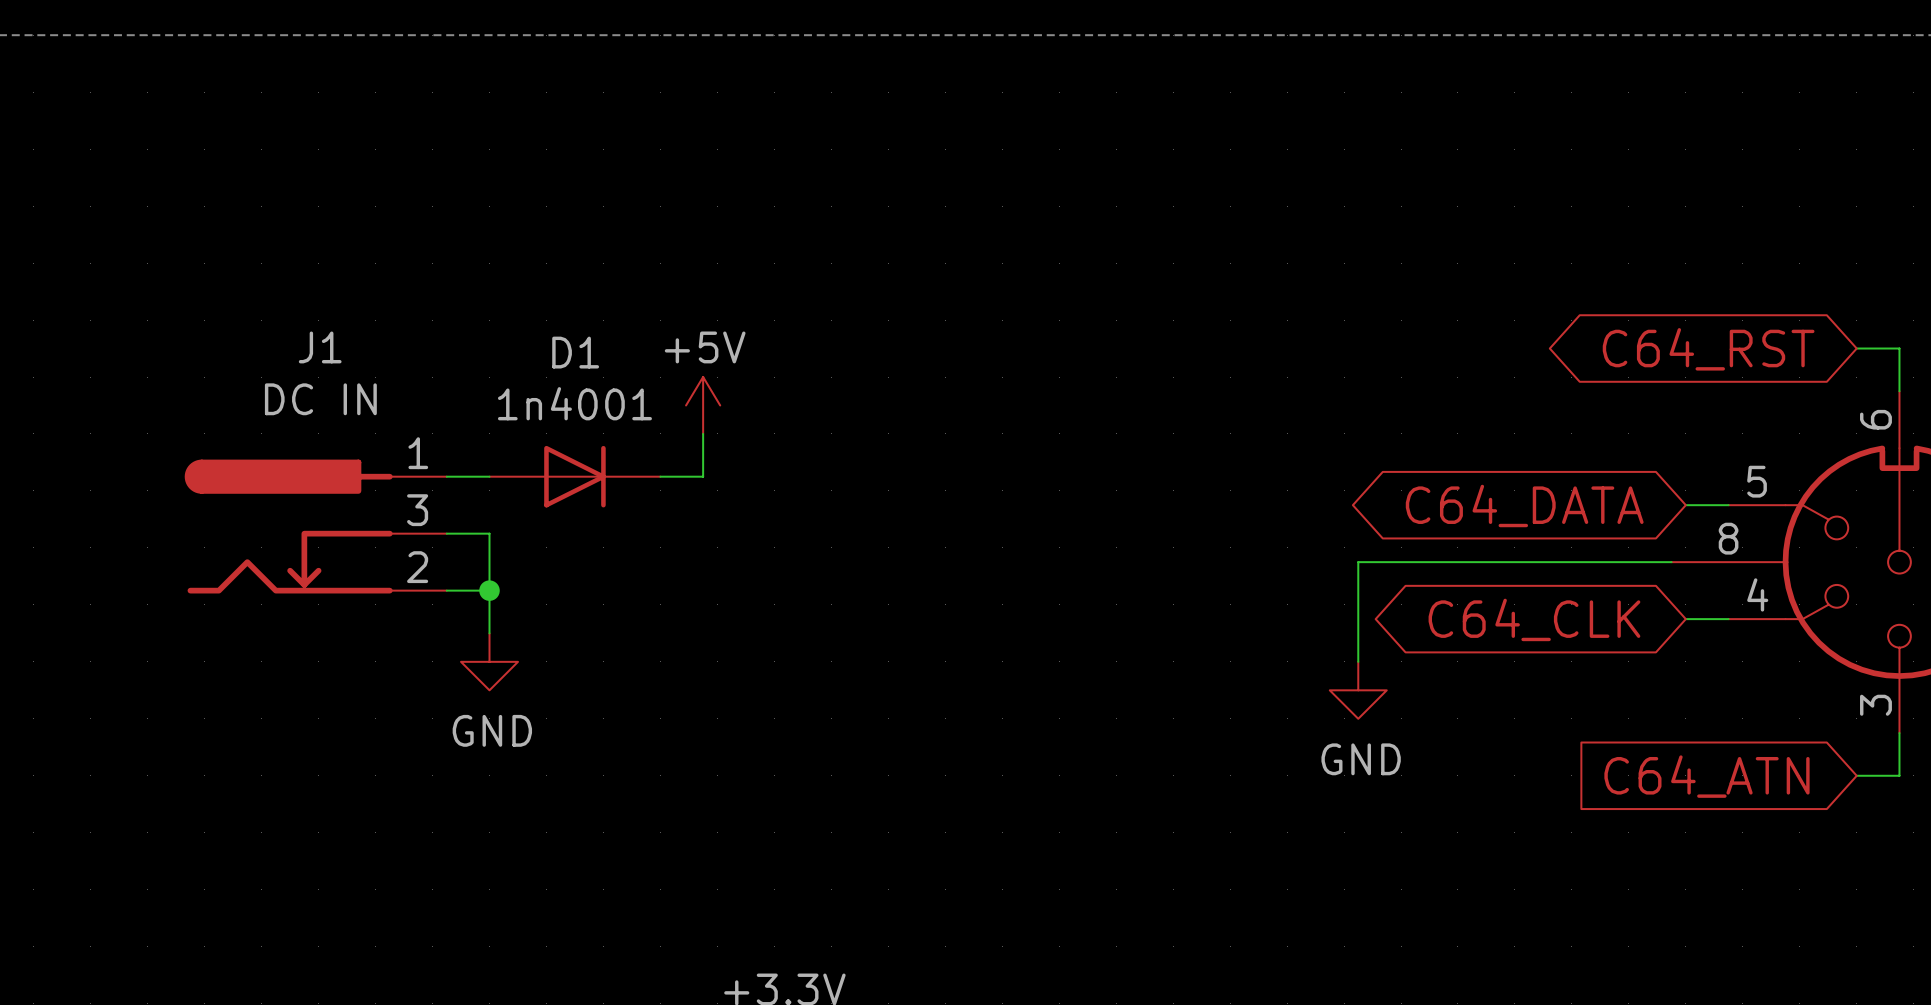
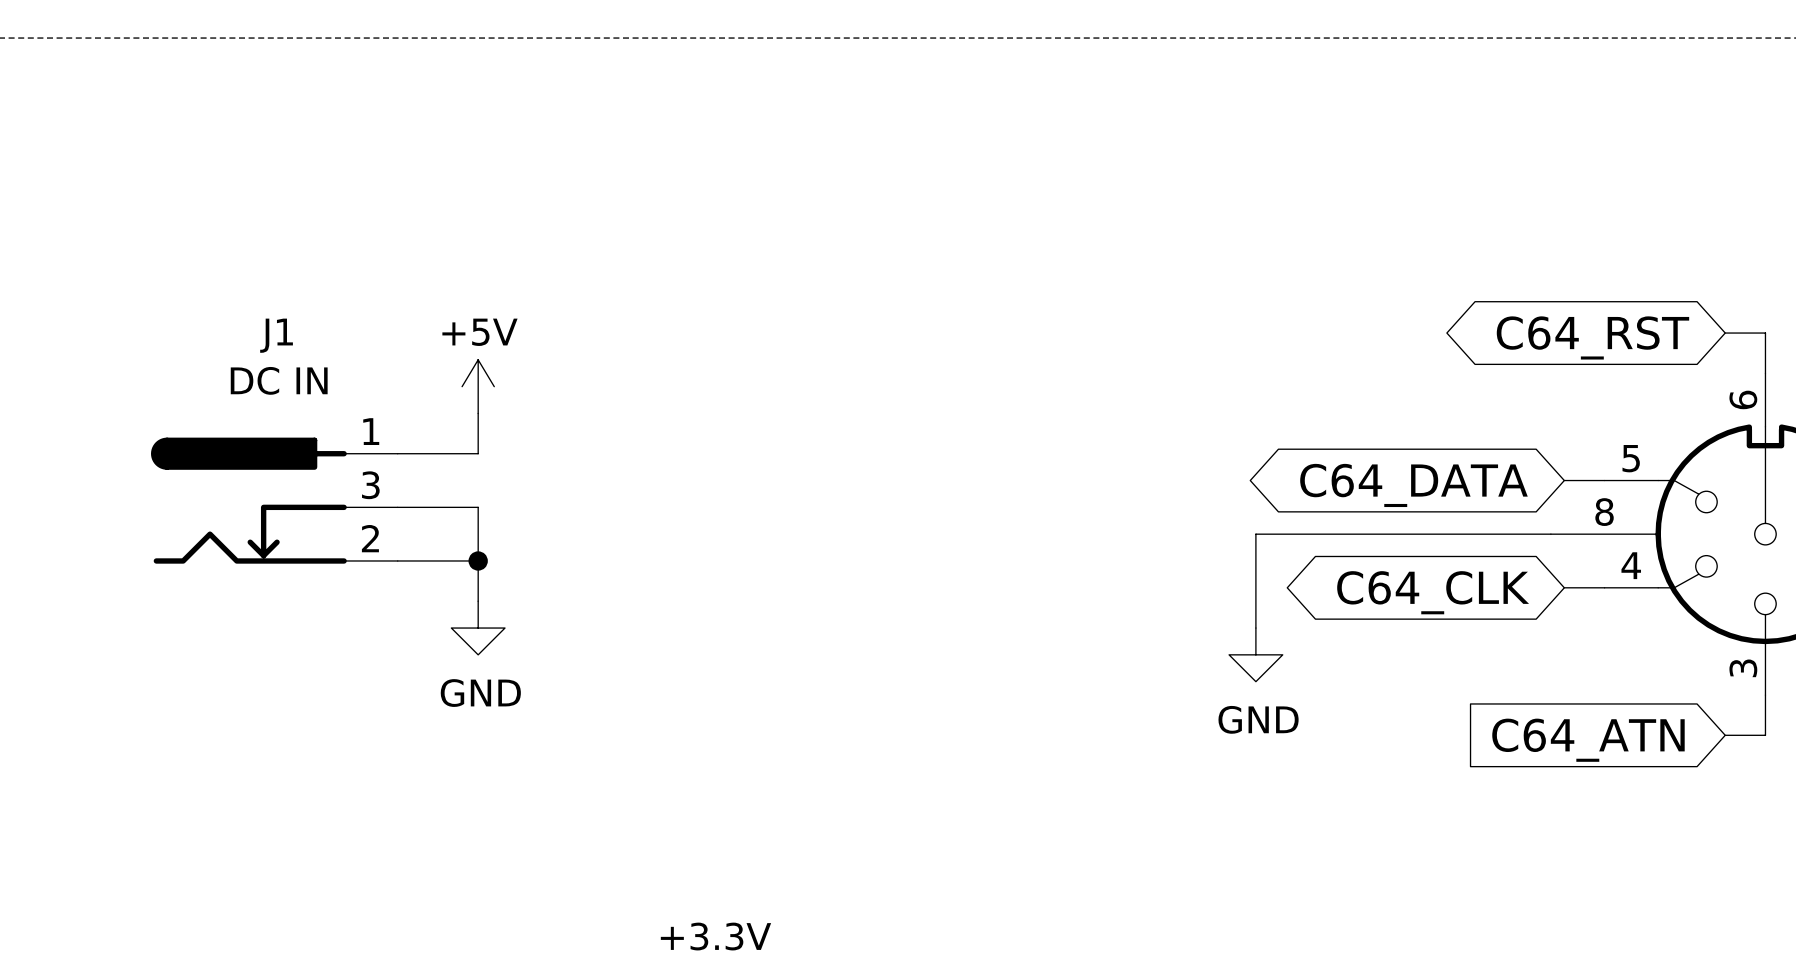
power symbol position: +5V (703, 405) -> +5V (478, 386)
wire: (703, 433) (703, 476) (660, 476) -> (478, 413) (478, 453) (437, 453)
D1: 1n4001 (574, 476) -> none
wire: (489, 533) (489, 633) -> (437, 507) (478, 507) (478, 601)
wire: none -> (437, 560) (478, 560)
junction position: (489, 590) -> (478, 560)
power symbol position: GND (489, 661) -> GND (478, 628)

